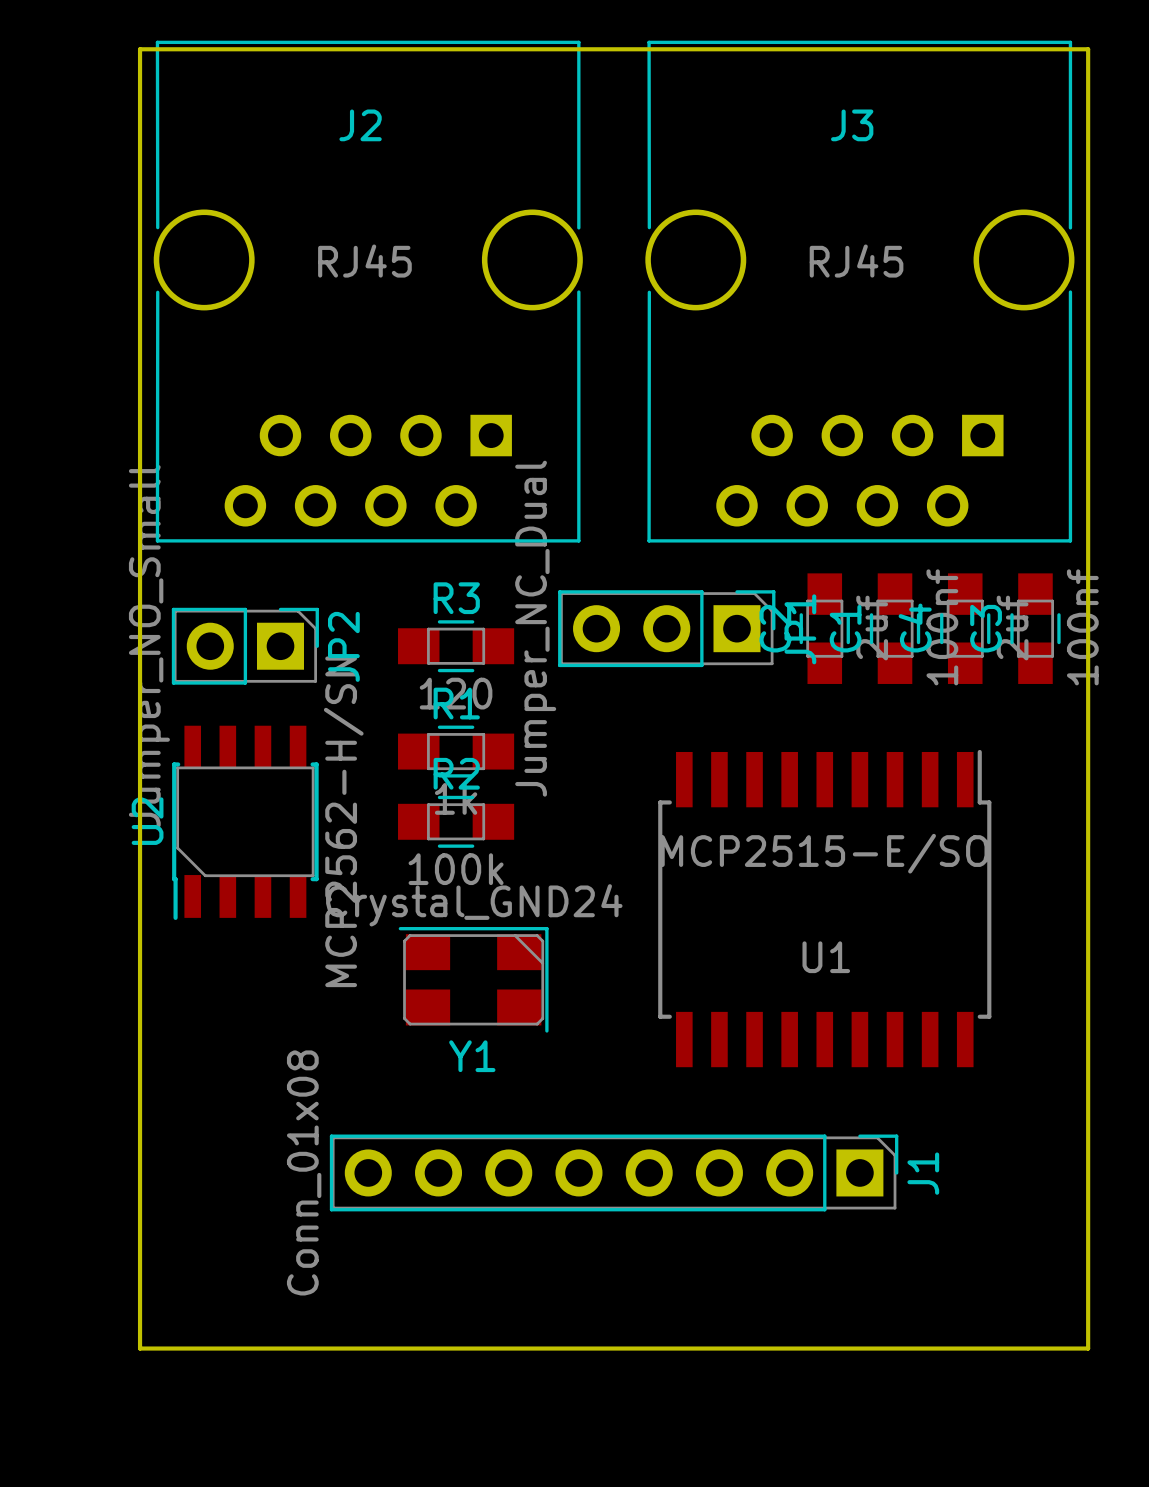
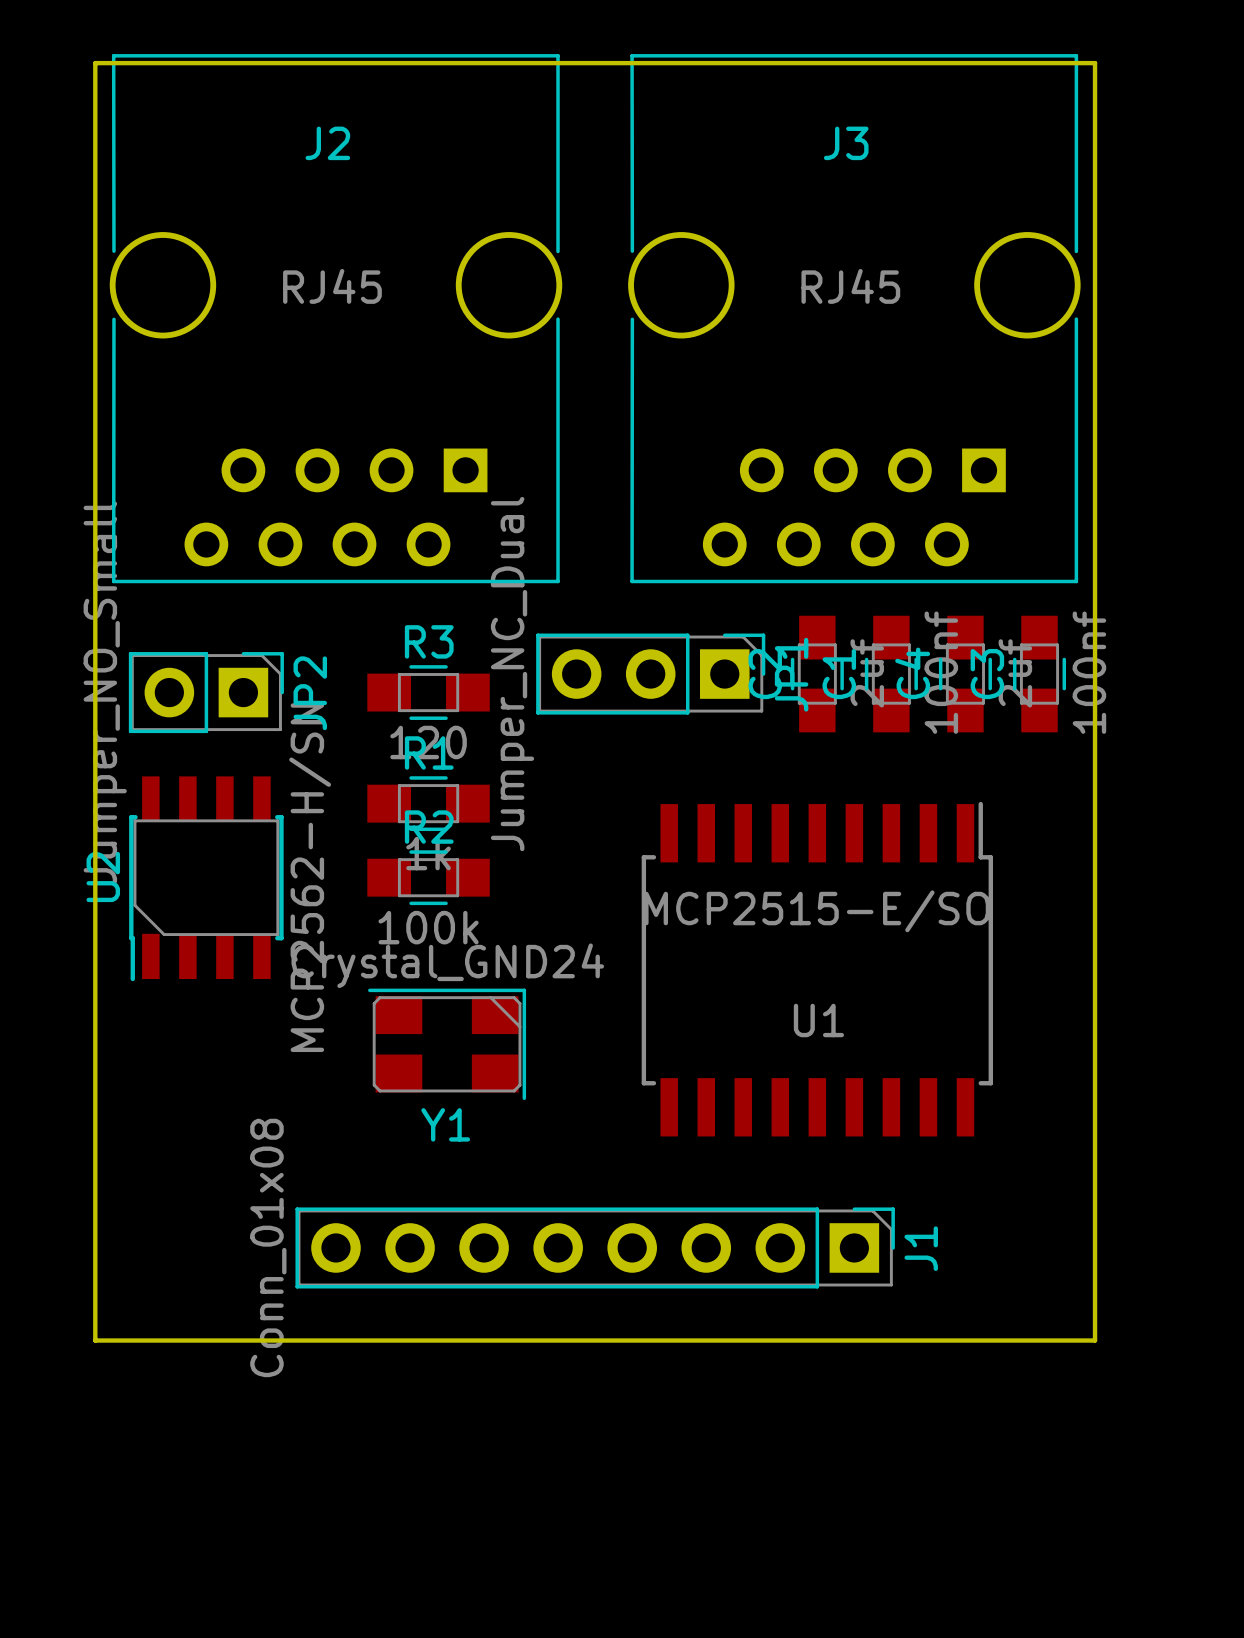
board edge: (140, 1260) (140, 1348) (1088, 1348) (1088, 1260) -> (95, 1340) (1095, 1340)

